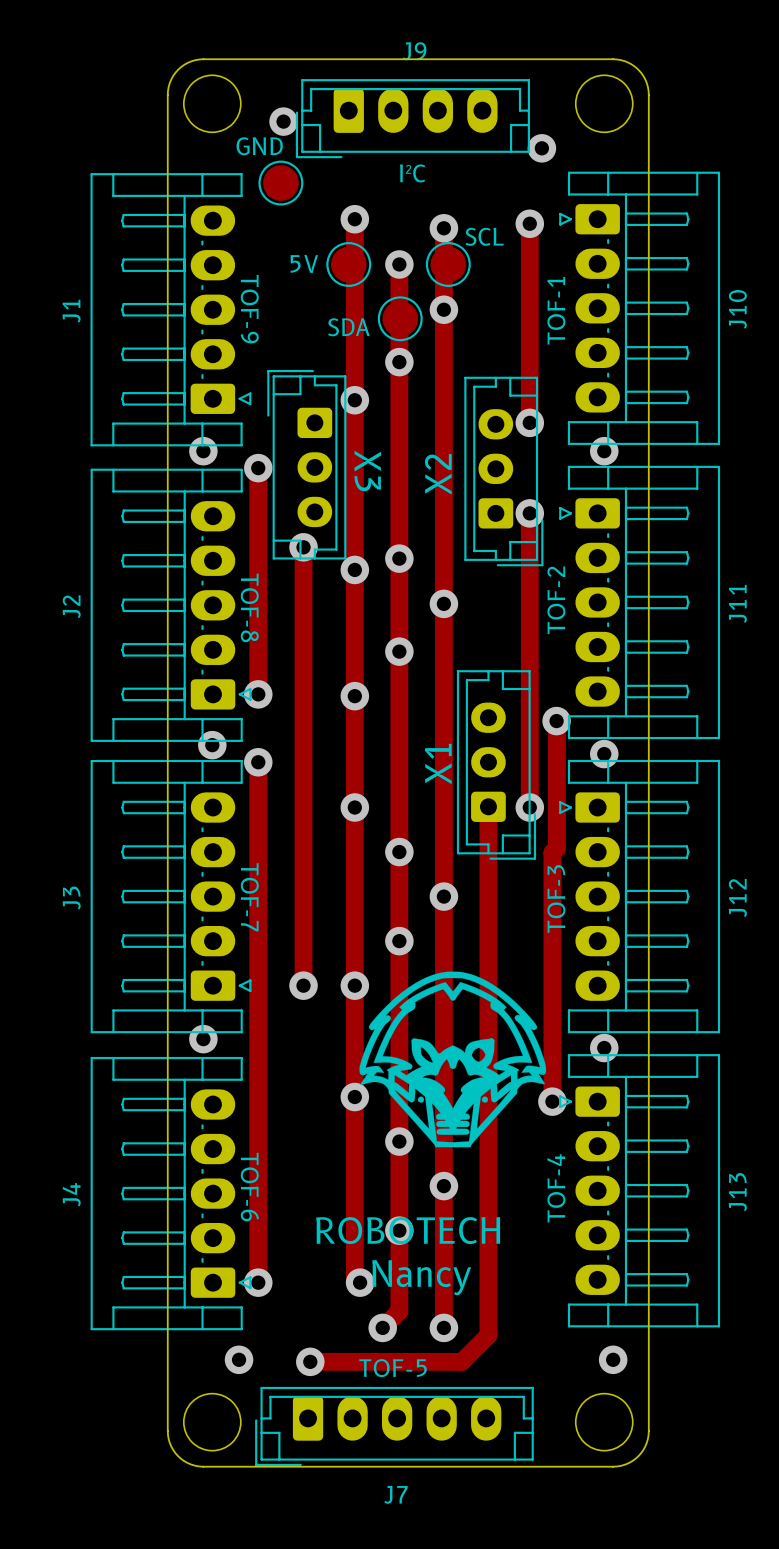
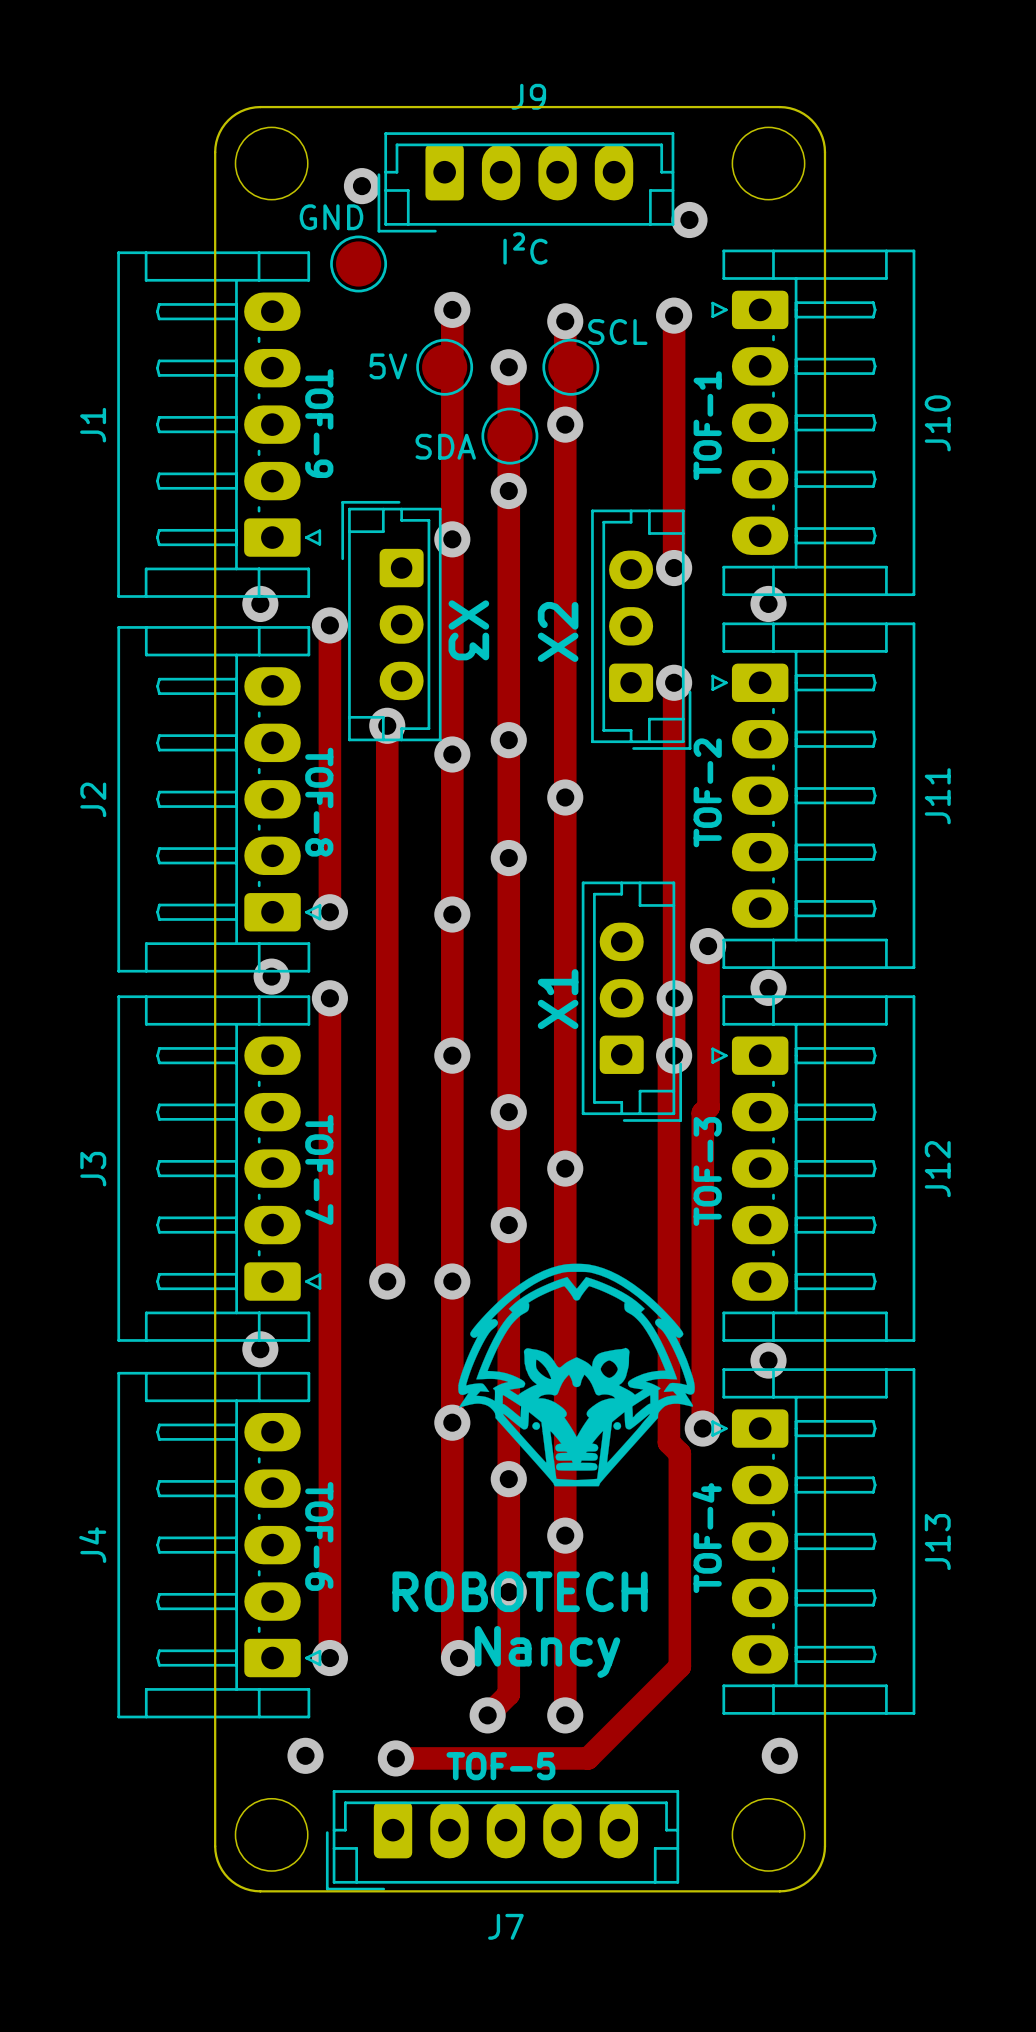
via: none -> (674, 998)
track: (488, 806) (488, 1335) -> (668, 1055) (668, 1442) (679, 1453) (679, 1666) (621, 1724)

